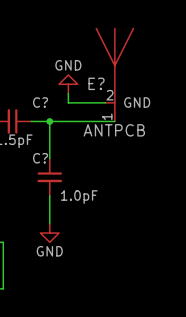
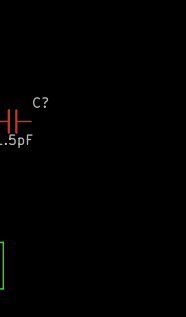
E?: ANTPCB (114, 74) -> none
power symbol: GND (68, 84) -> none
wire: (68, 93) (68, 102) (105, 102) -> none
wire: (31, 121) (114, 121) -> none
wire: (49, 121) (49, 158) -> none
junction: (49, 121) -> none
C?: 1.0pF (49, 177) -> none
wire: (49, 195) (49, 223) -> none
power symbol: GND (49, 233) -> none

